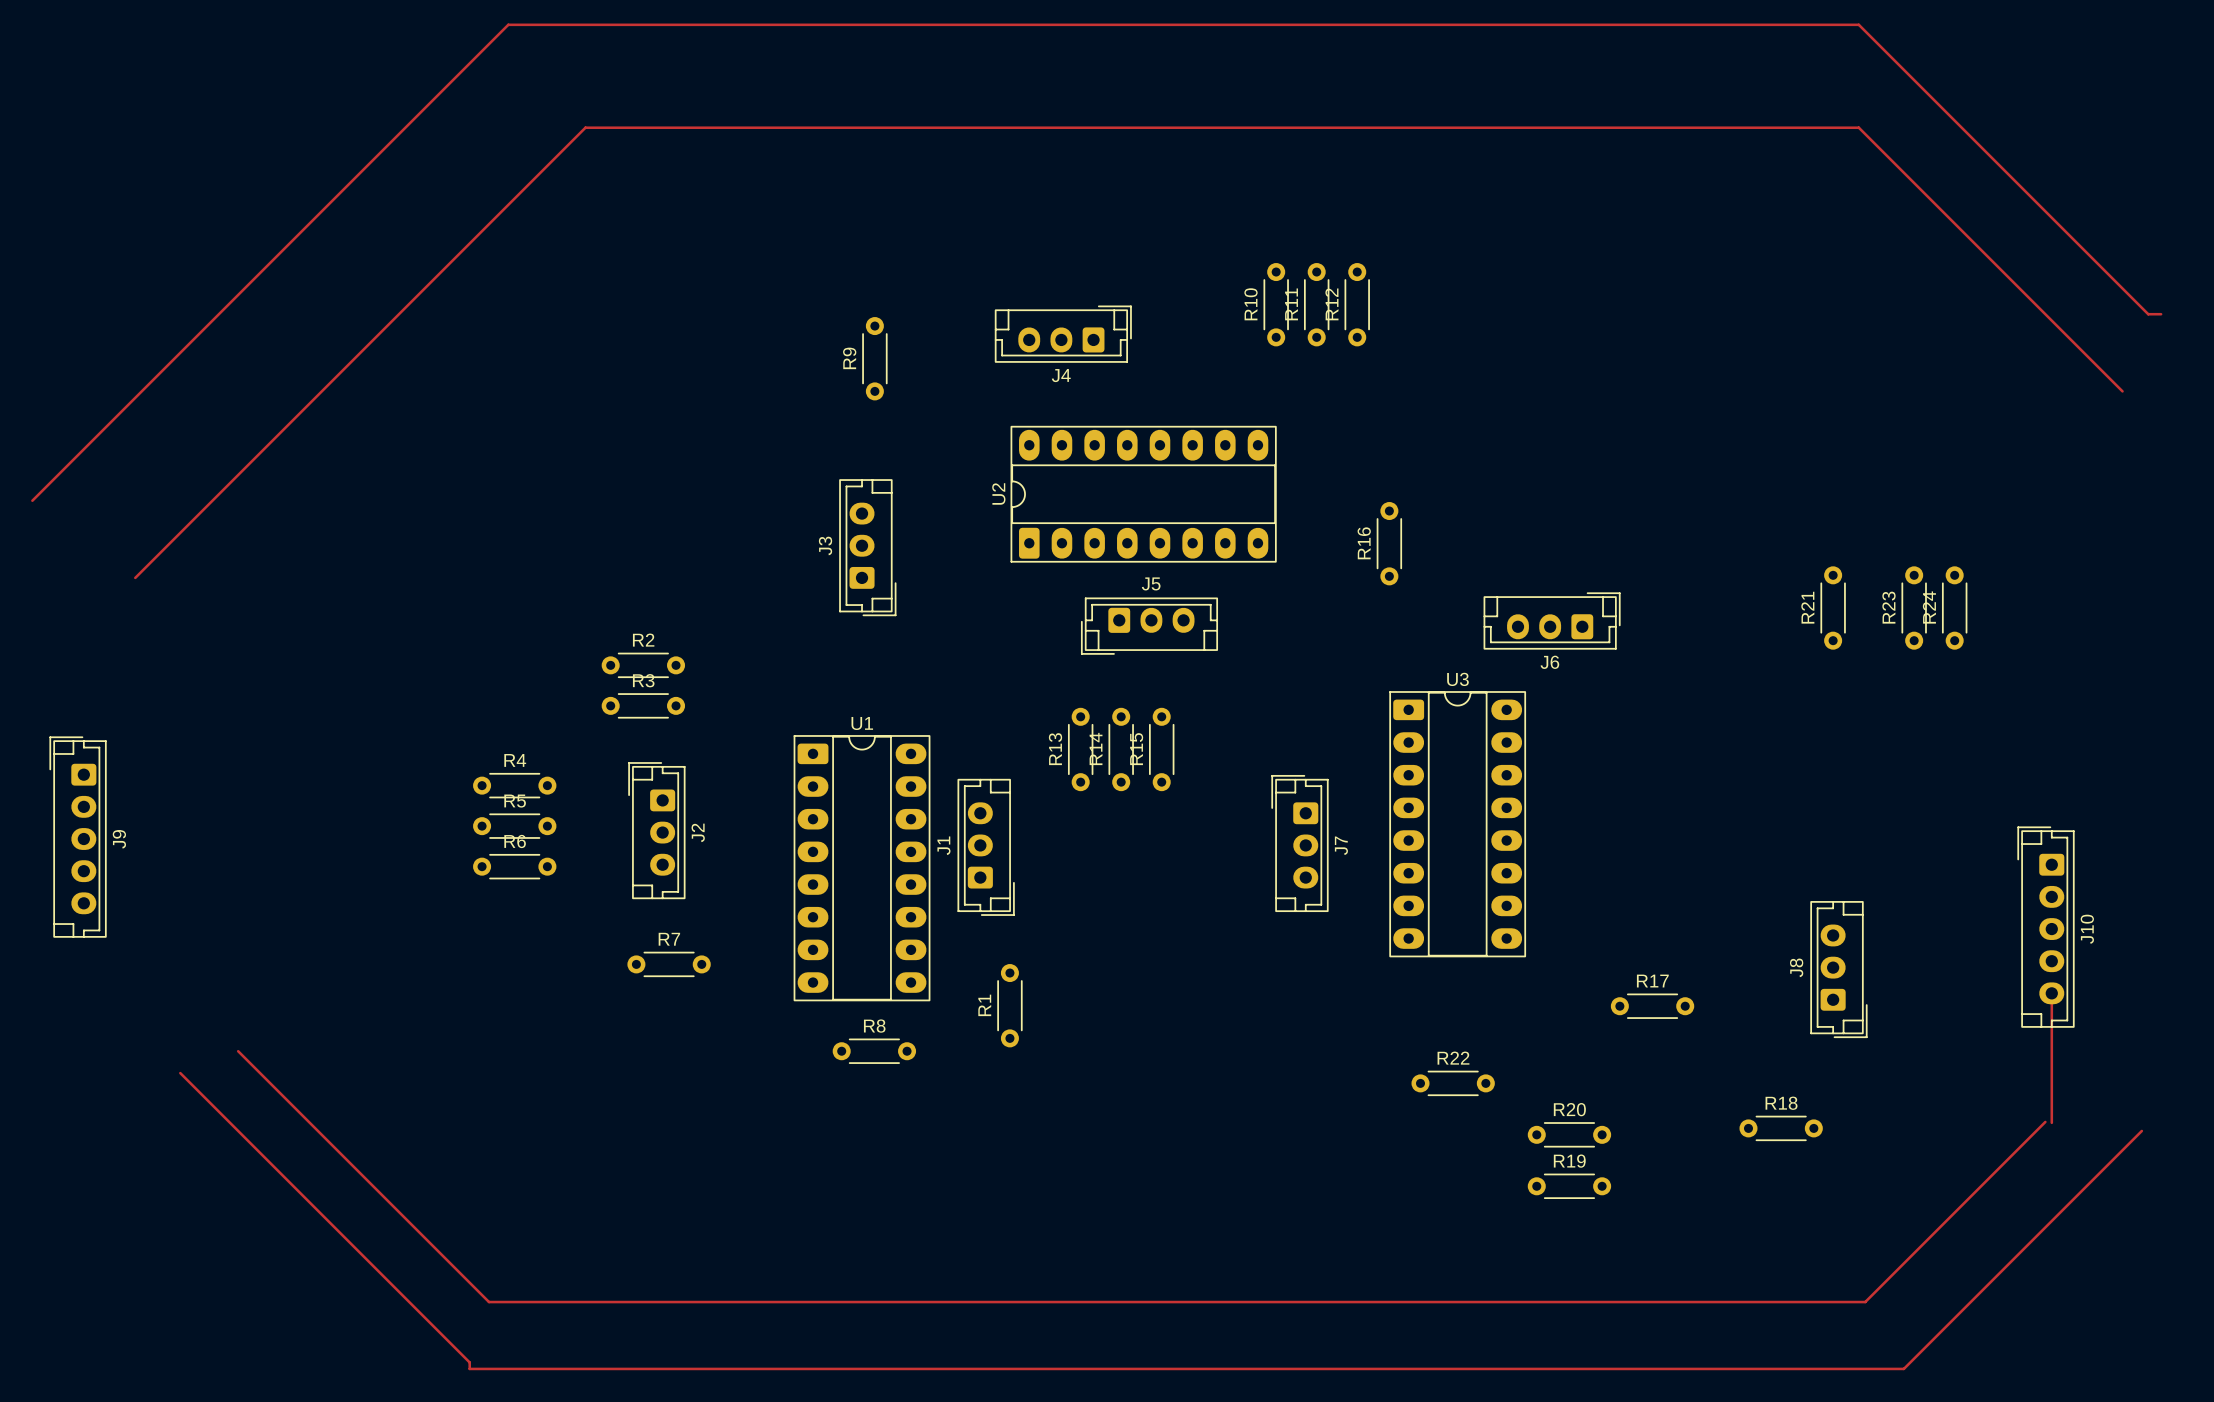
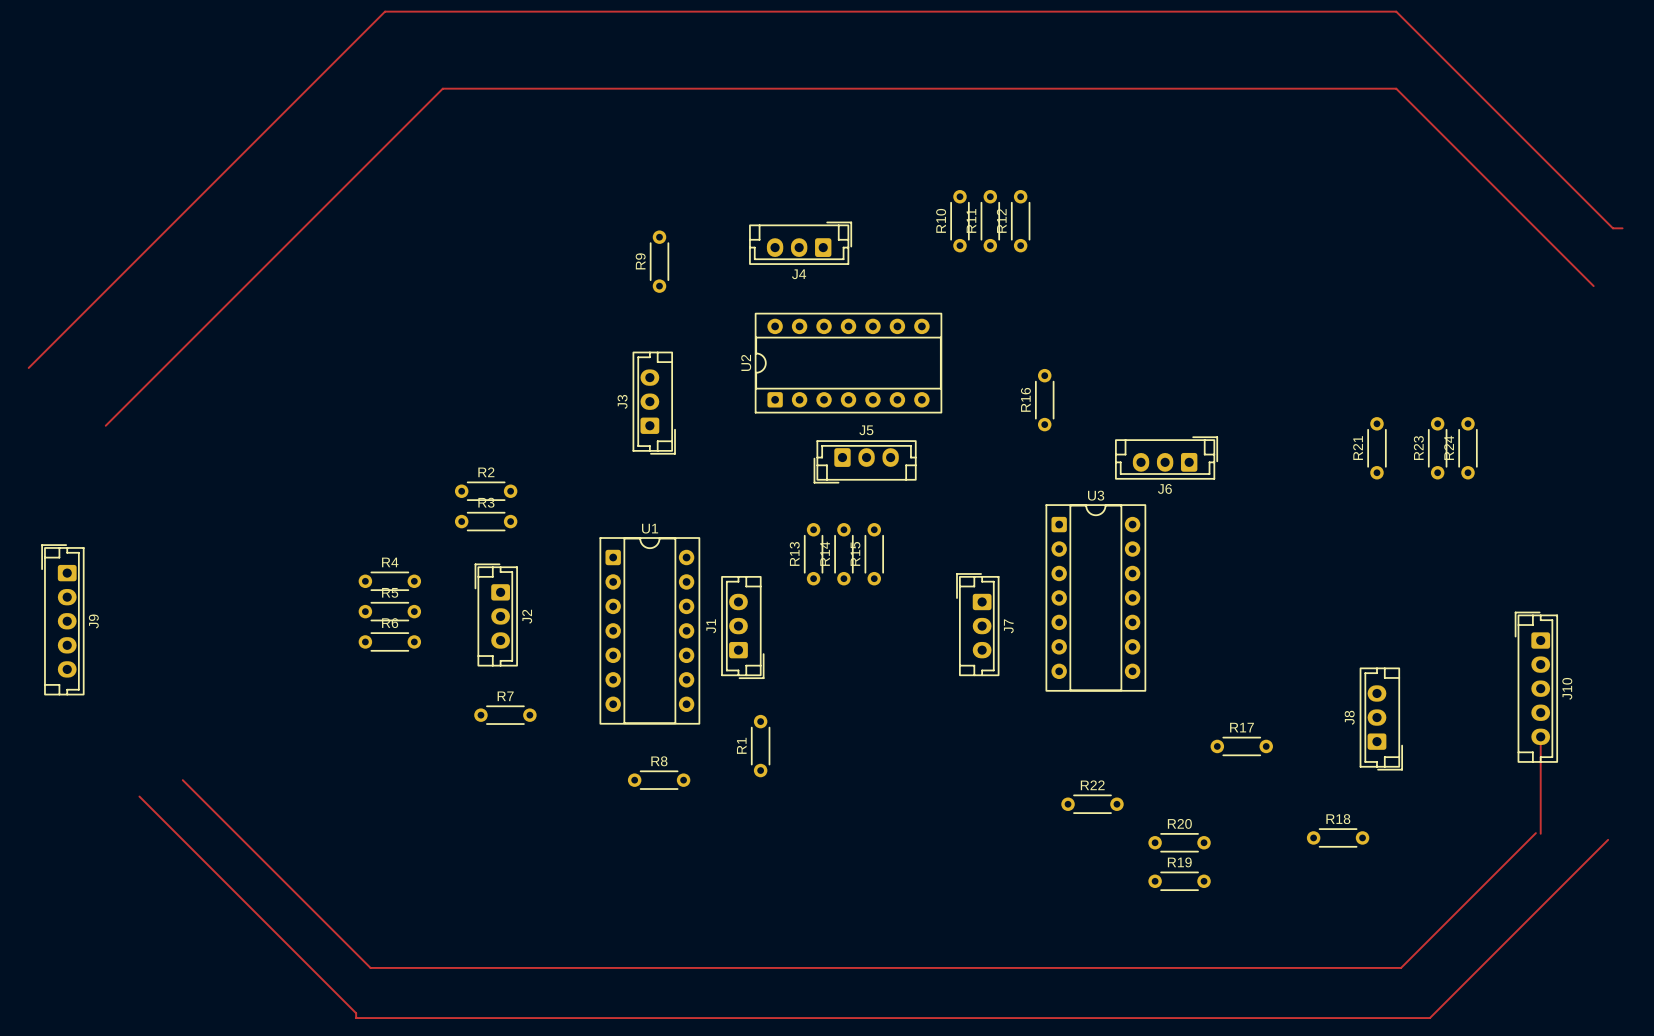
U2 footprint: [1010, 425, 1277, 563] -> [755, 313, 942, 414]
U3 footprint: [1389, 691, 1526, 958] -> [1045, 504, 1146, 692]
U1 footprint: [793, 735, 931, 1002] -> [599, 537, 700, 725]

